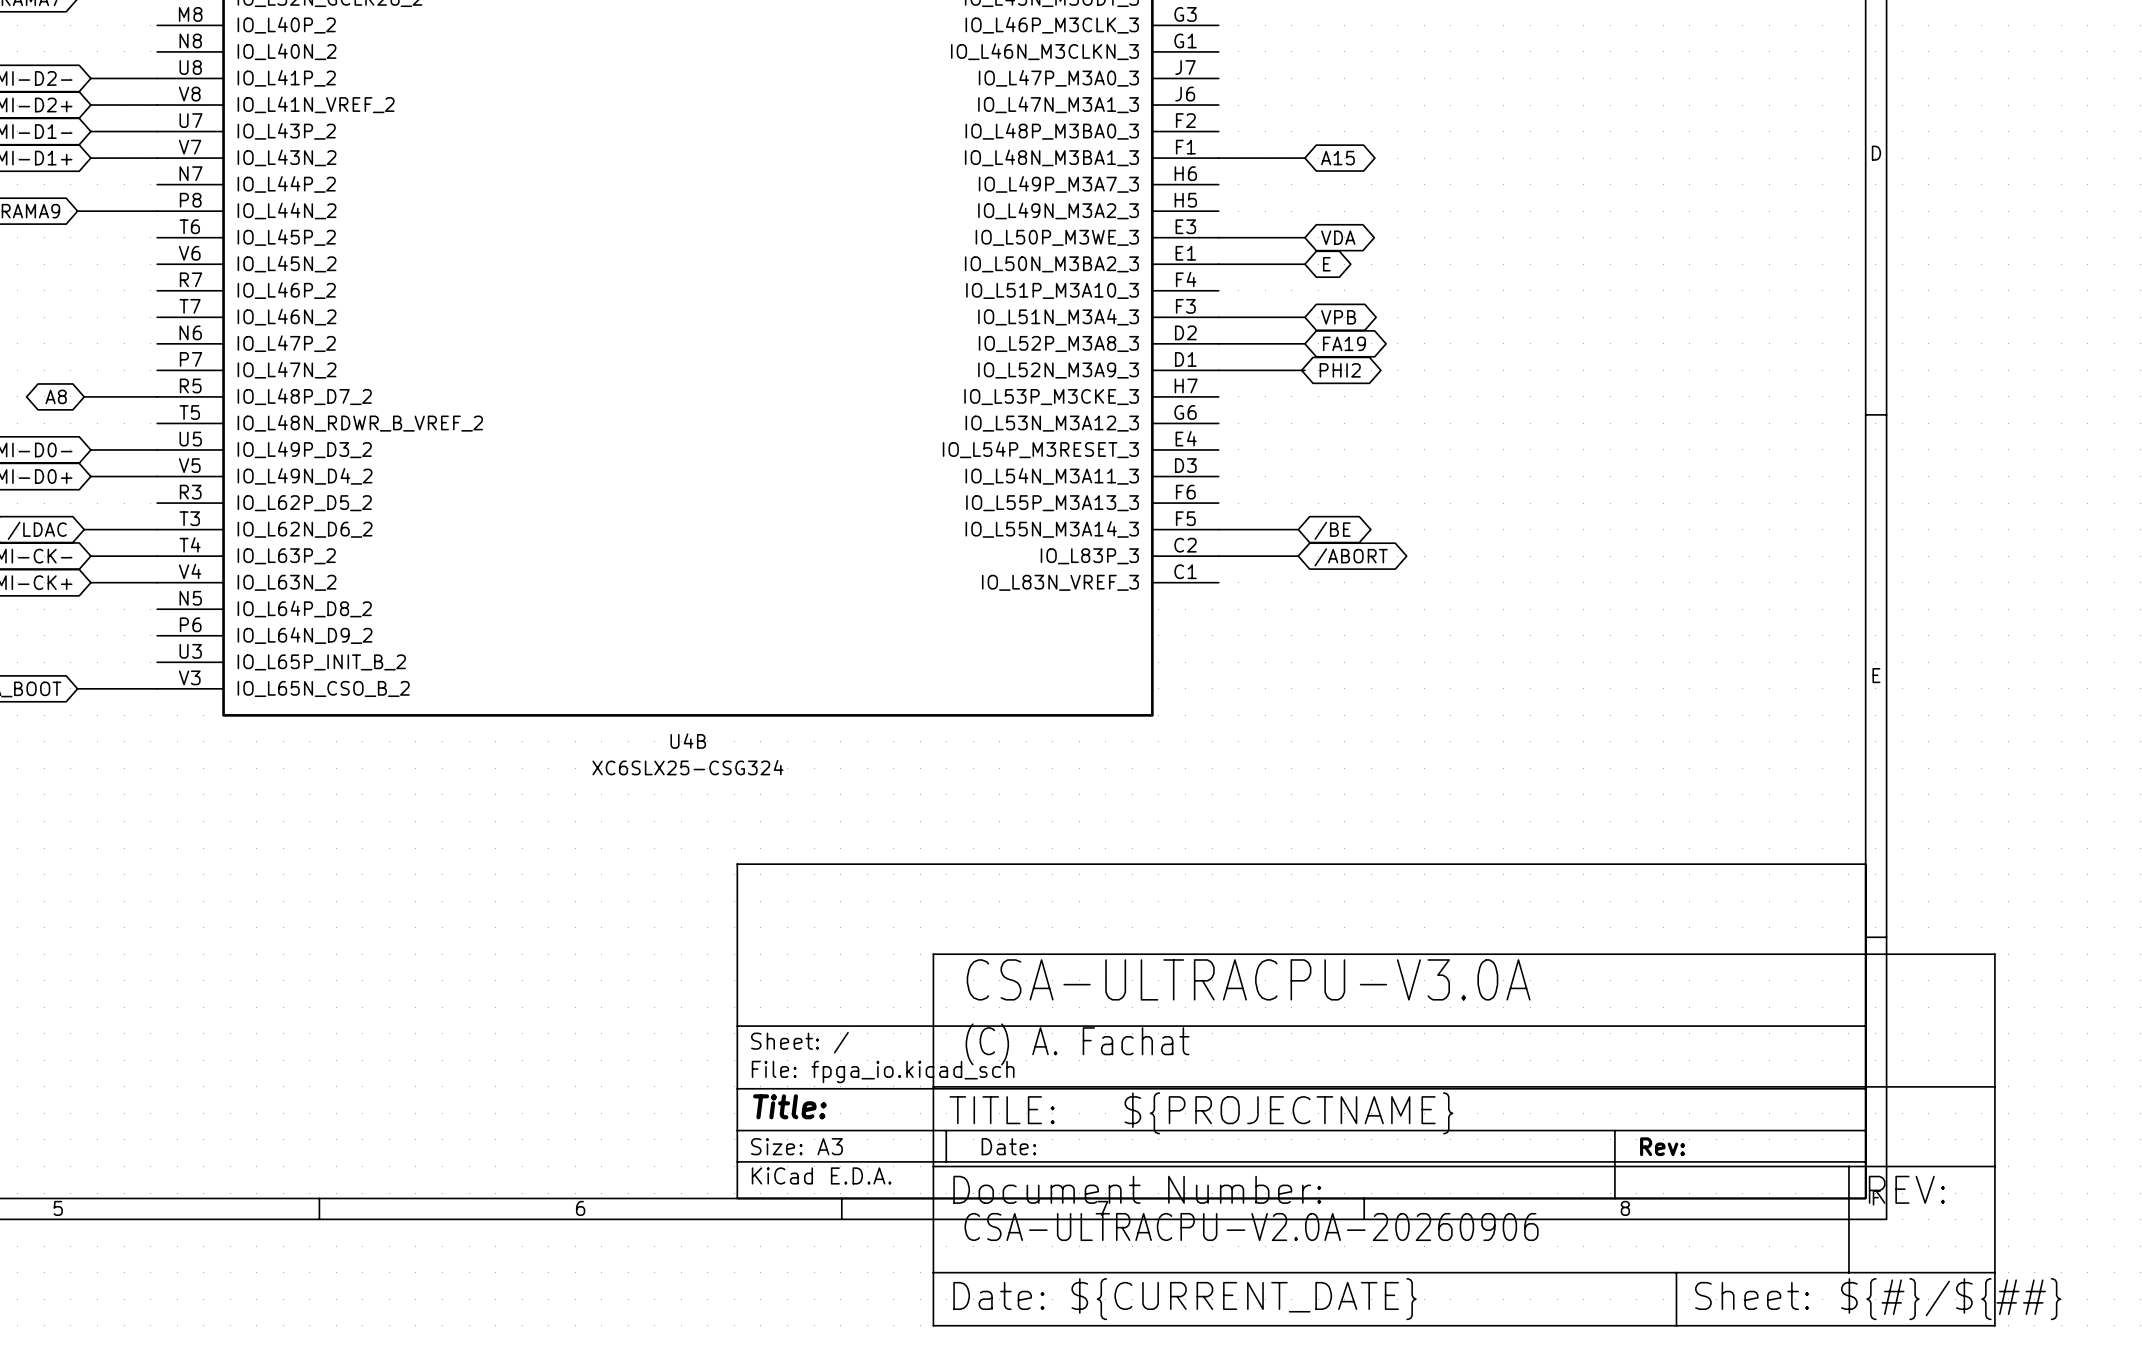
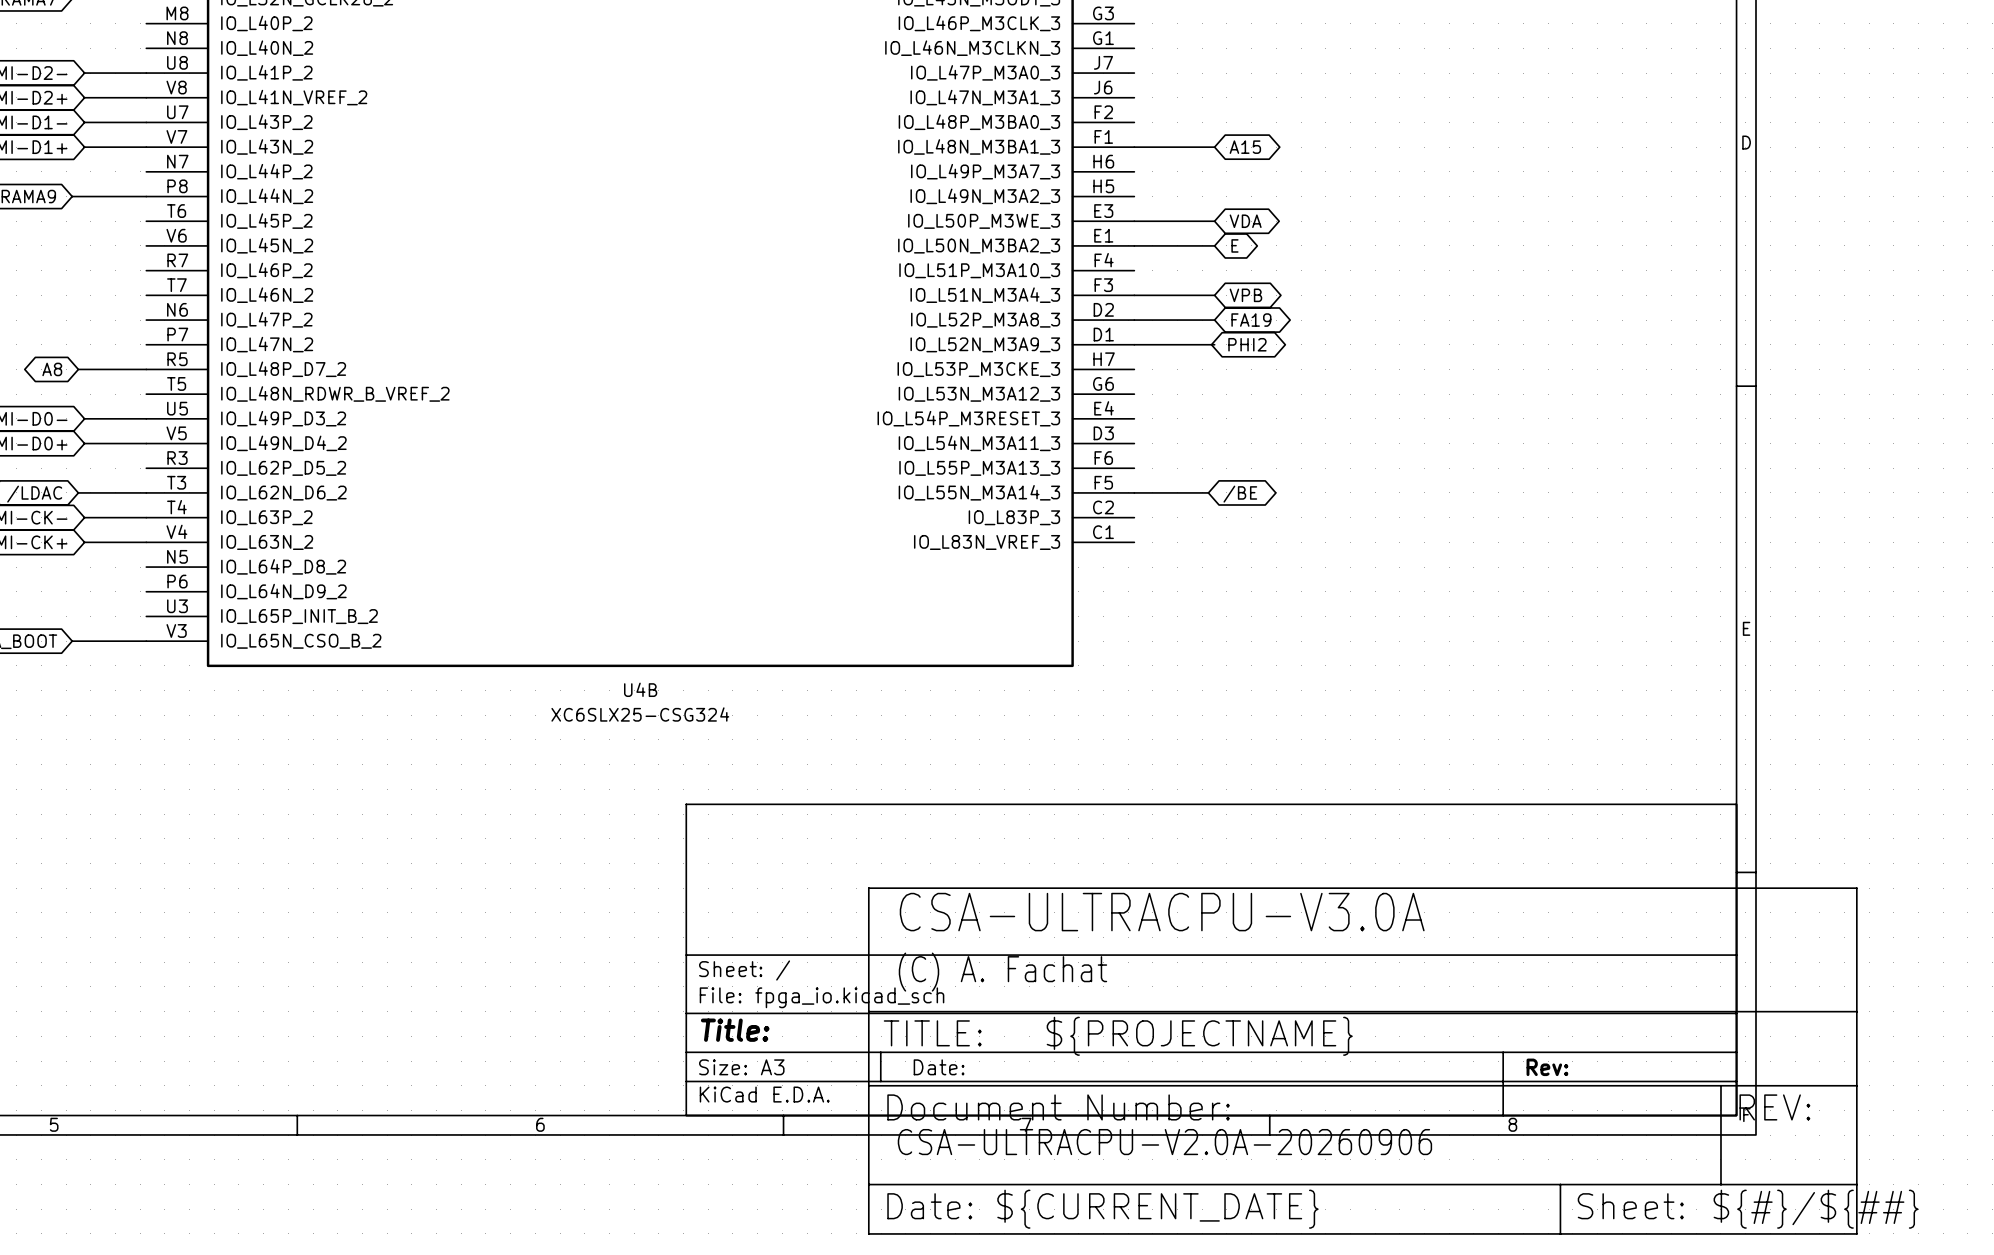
wire: (1218, 556) (1298, 556) -> none
global label: /ABORT (1351, 557) -> none

